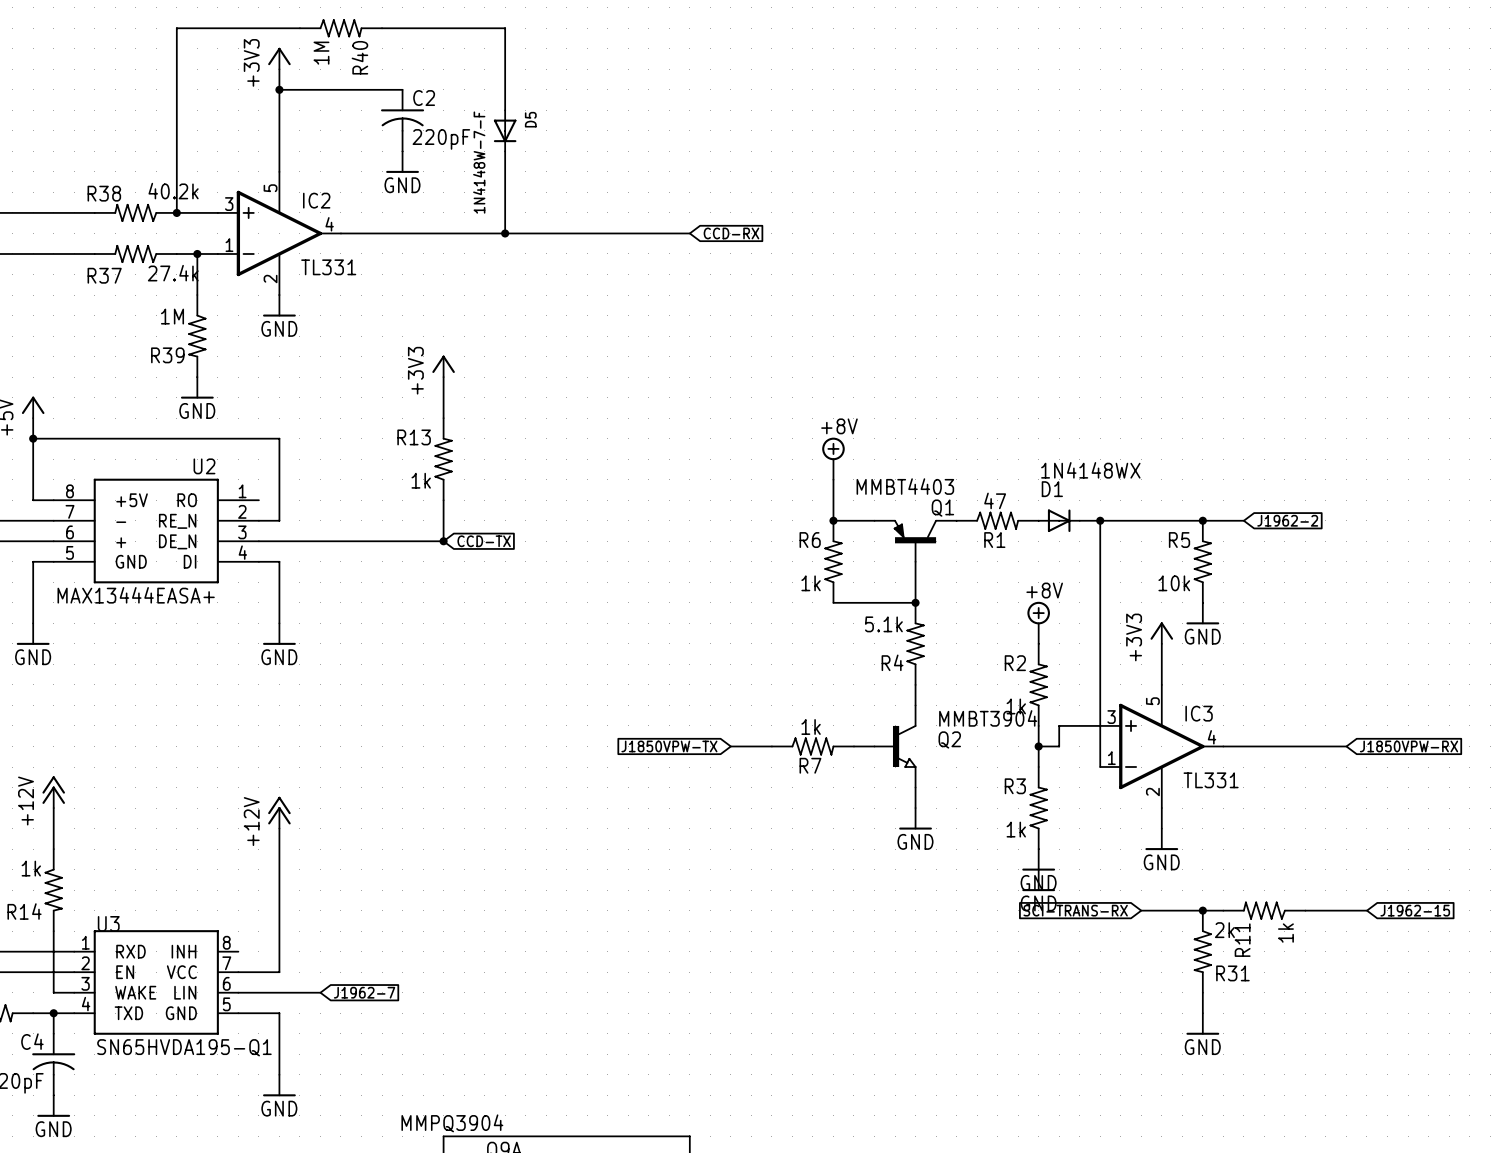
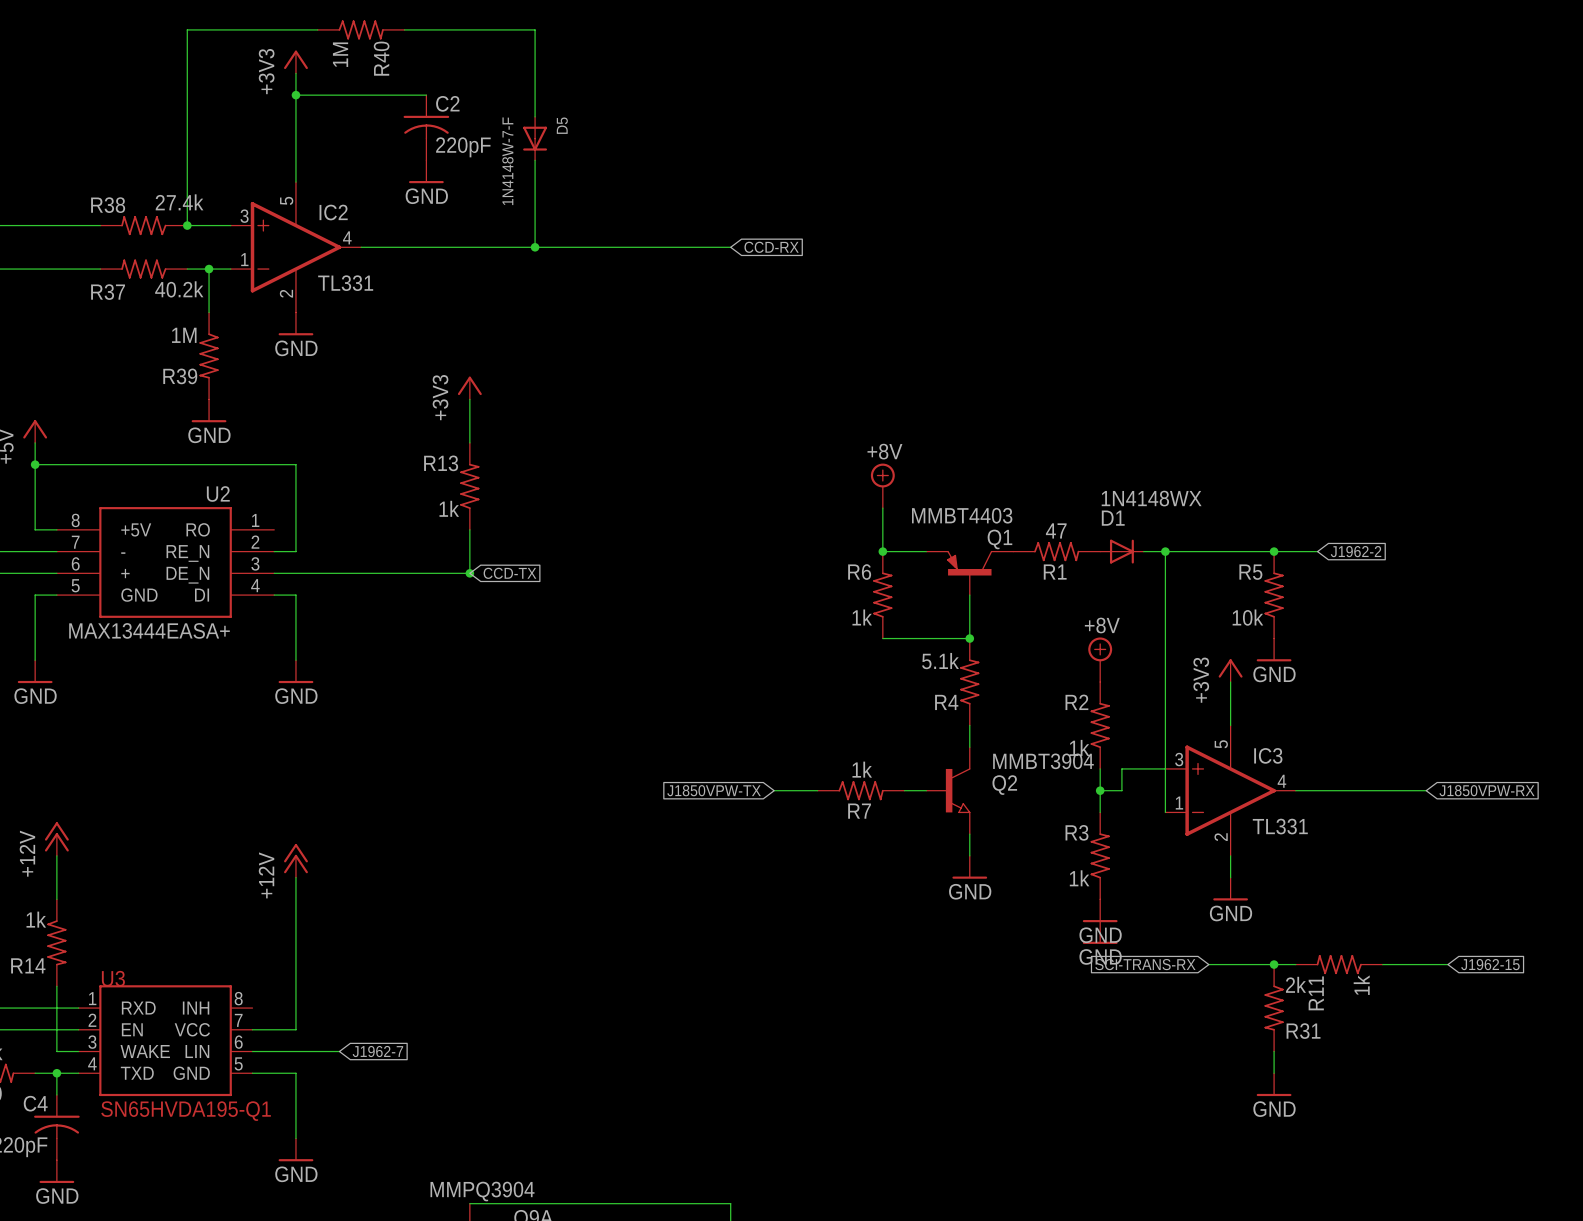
R38 value: 40.2k (173, 191) -> 27.4k (179, 202)
R37 value: 27.4k (173, 273) -> 40.2k (179, 289)

